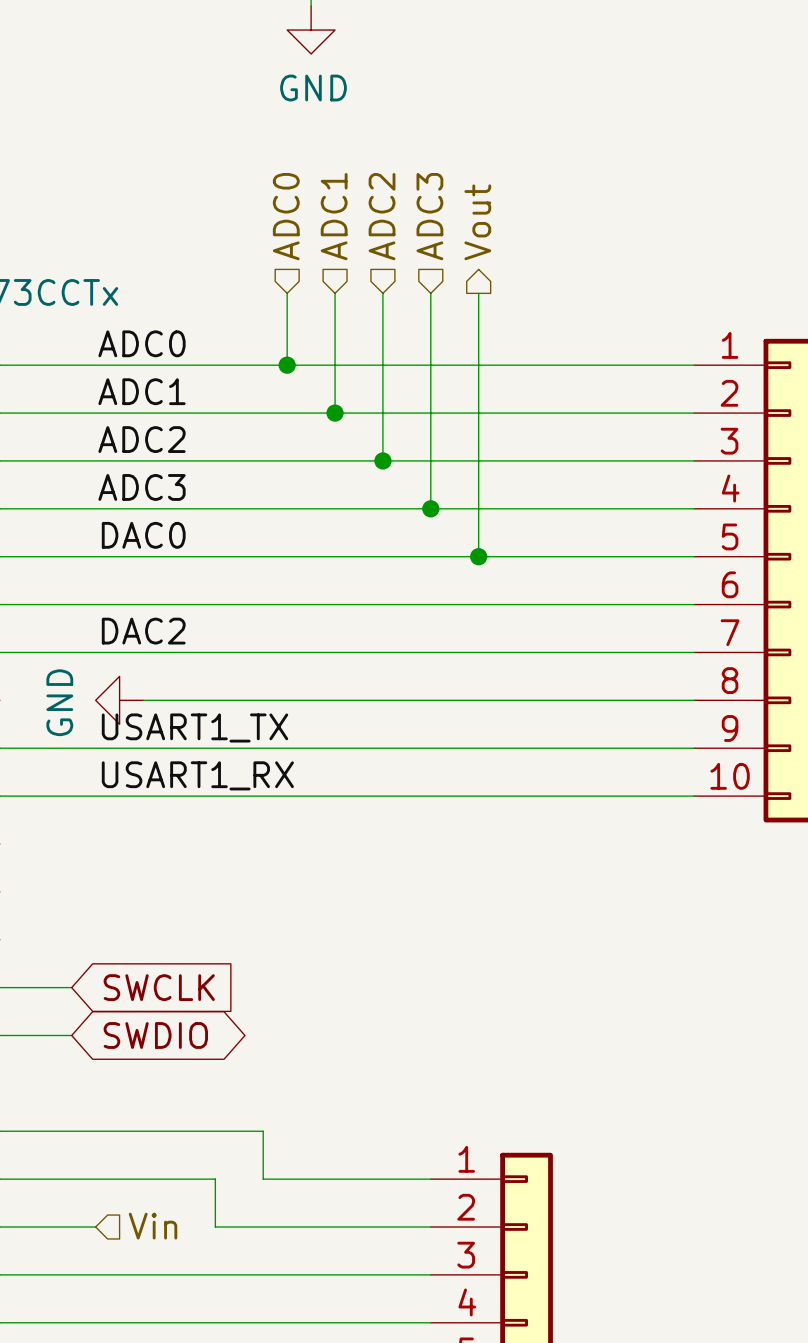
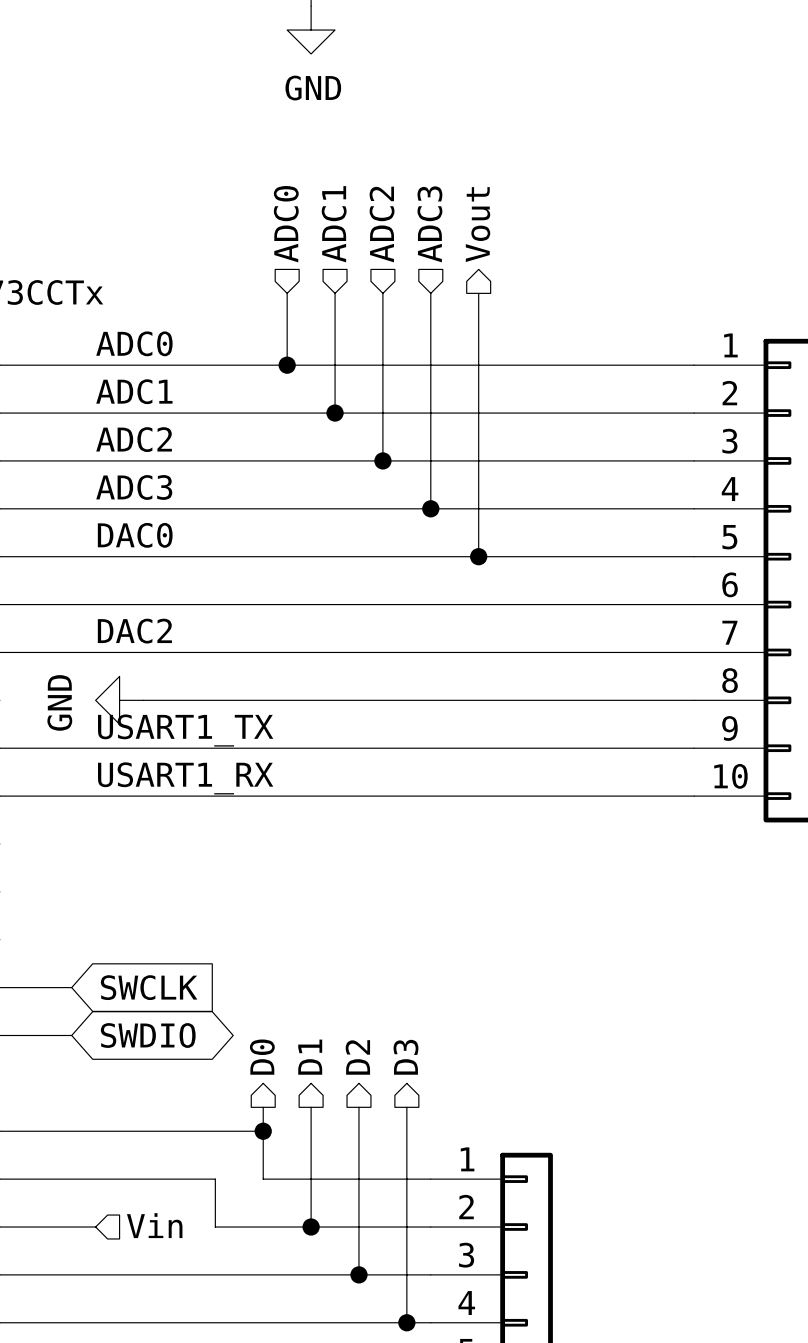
hierarchical label: none -> D0 (262, 1057)
hierarchical label: none -> D1 (310, 1057)
hierarchical label: none -> D2 (357, 1057)
hierarchical label: none -> D3 (405, 1057)
wire: none -> (263, 1107) (263, 1131)
wire: none -> (311, 1107) (311, 1227)
wire: none -> (358, 1107) (358, 1274)
wire: none -> (406, 1107) (406, 1322)
junction: none -> (263, 1131)
junction: none -> (311, 1227)
junction: none -> (358, 1274)
junction: none -> (406, 1322)

